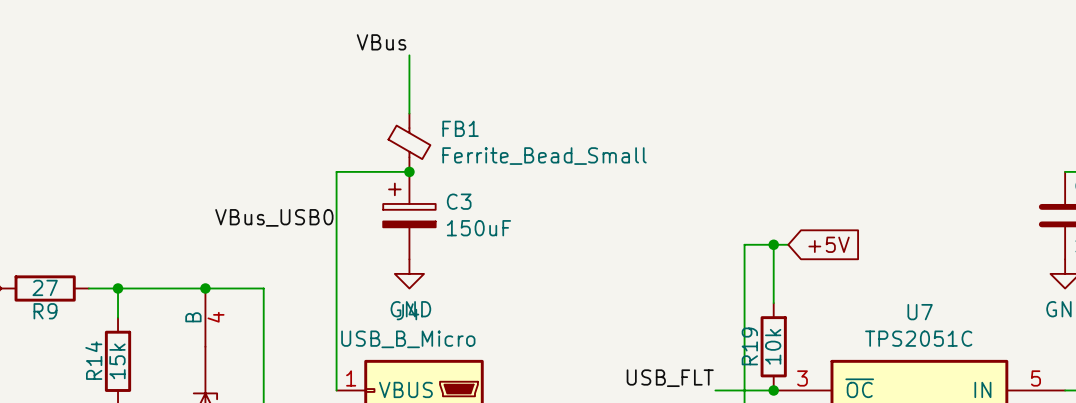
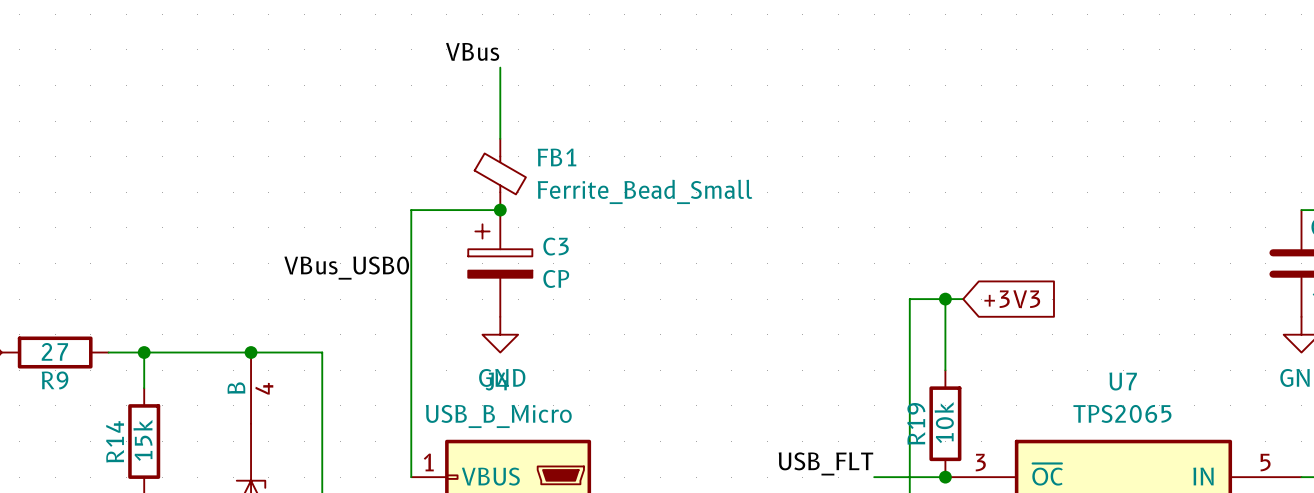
C3 value: 150uF (478, 228) -> CP (556, 278)
global label: +5V (829, 244) -> +3V3 (1012, 299)
U7 value: TPS2051C (918, 338) -> TPS2065 (1122, 413)

